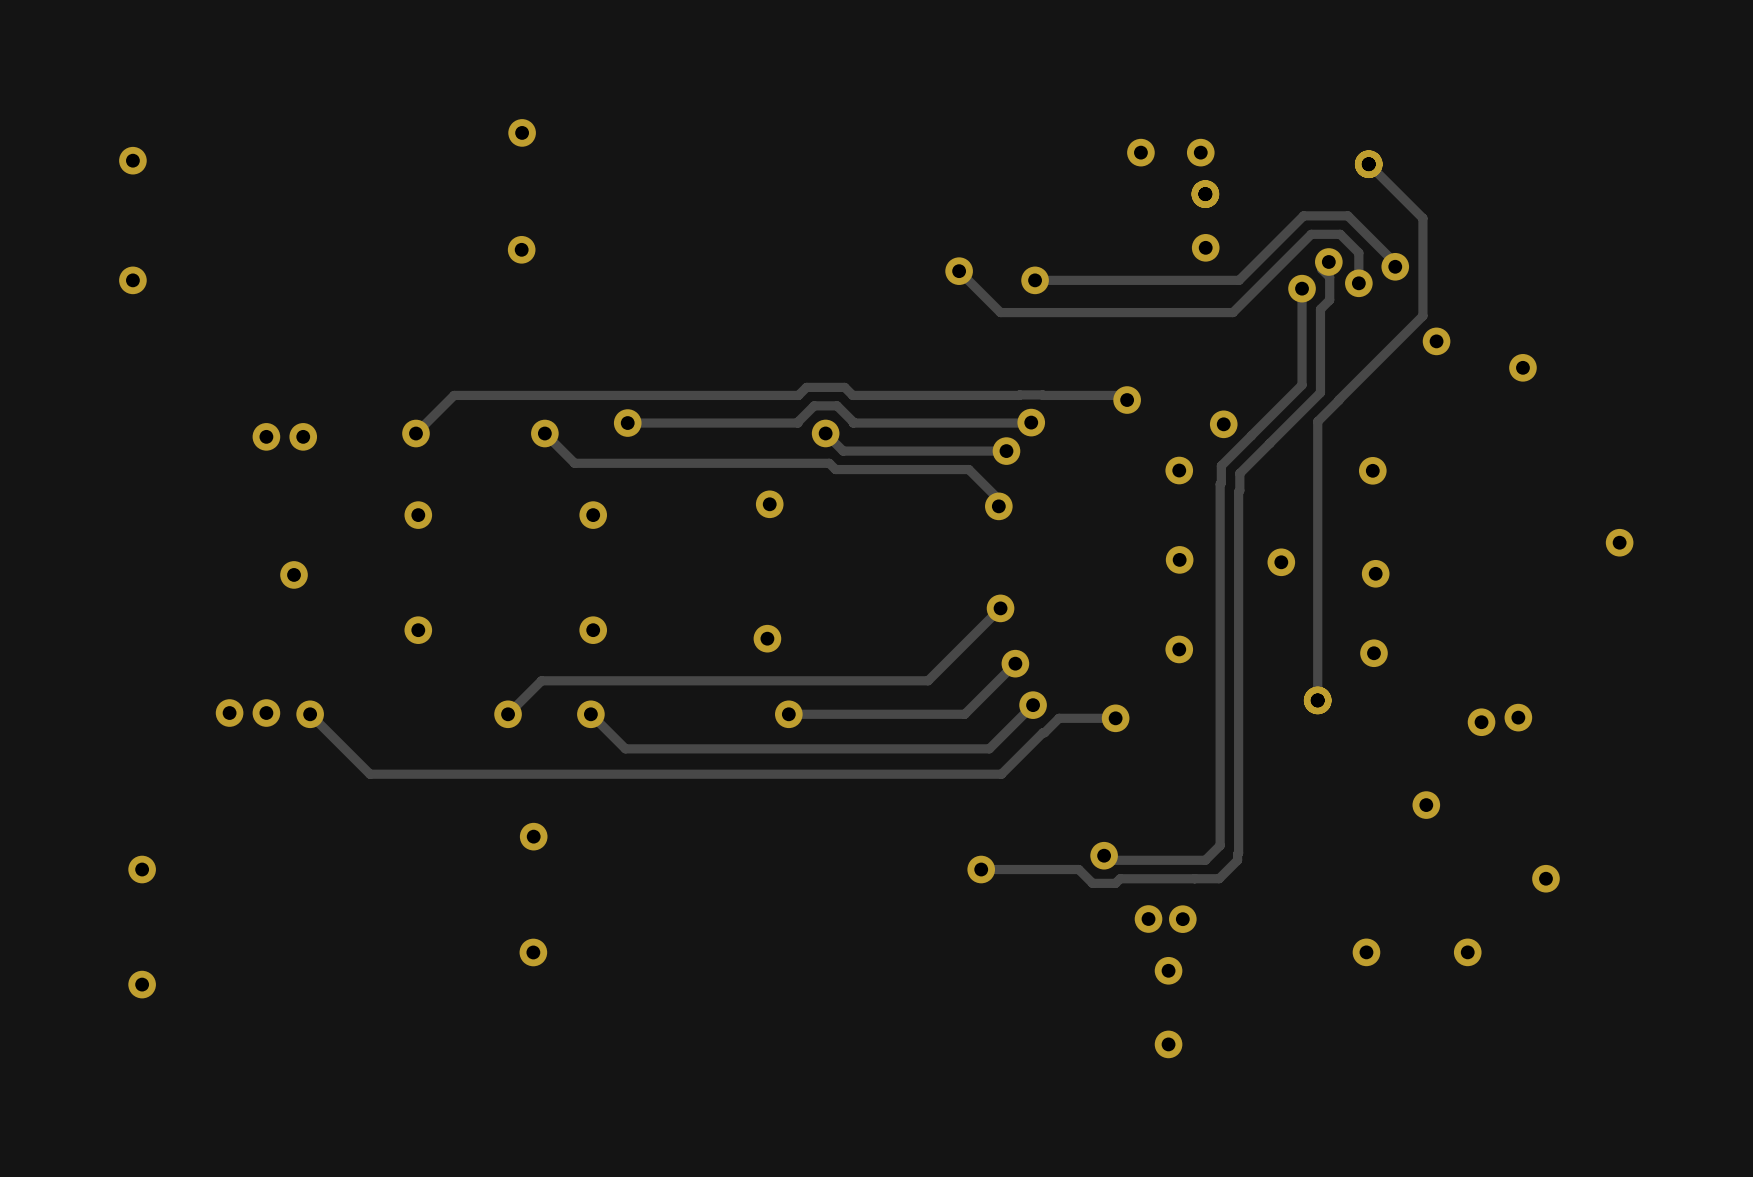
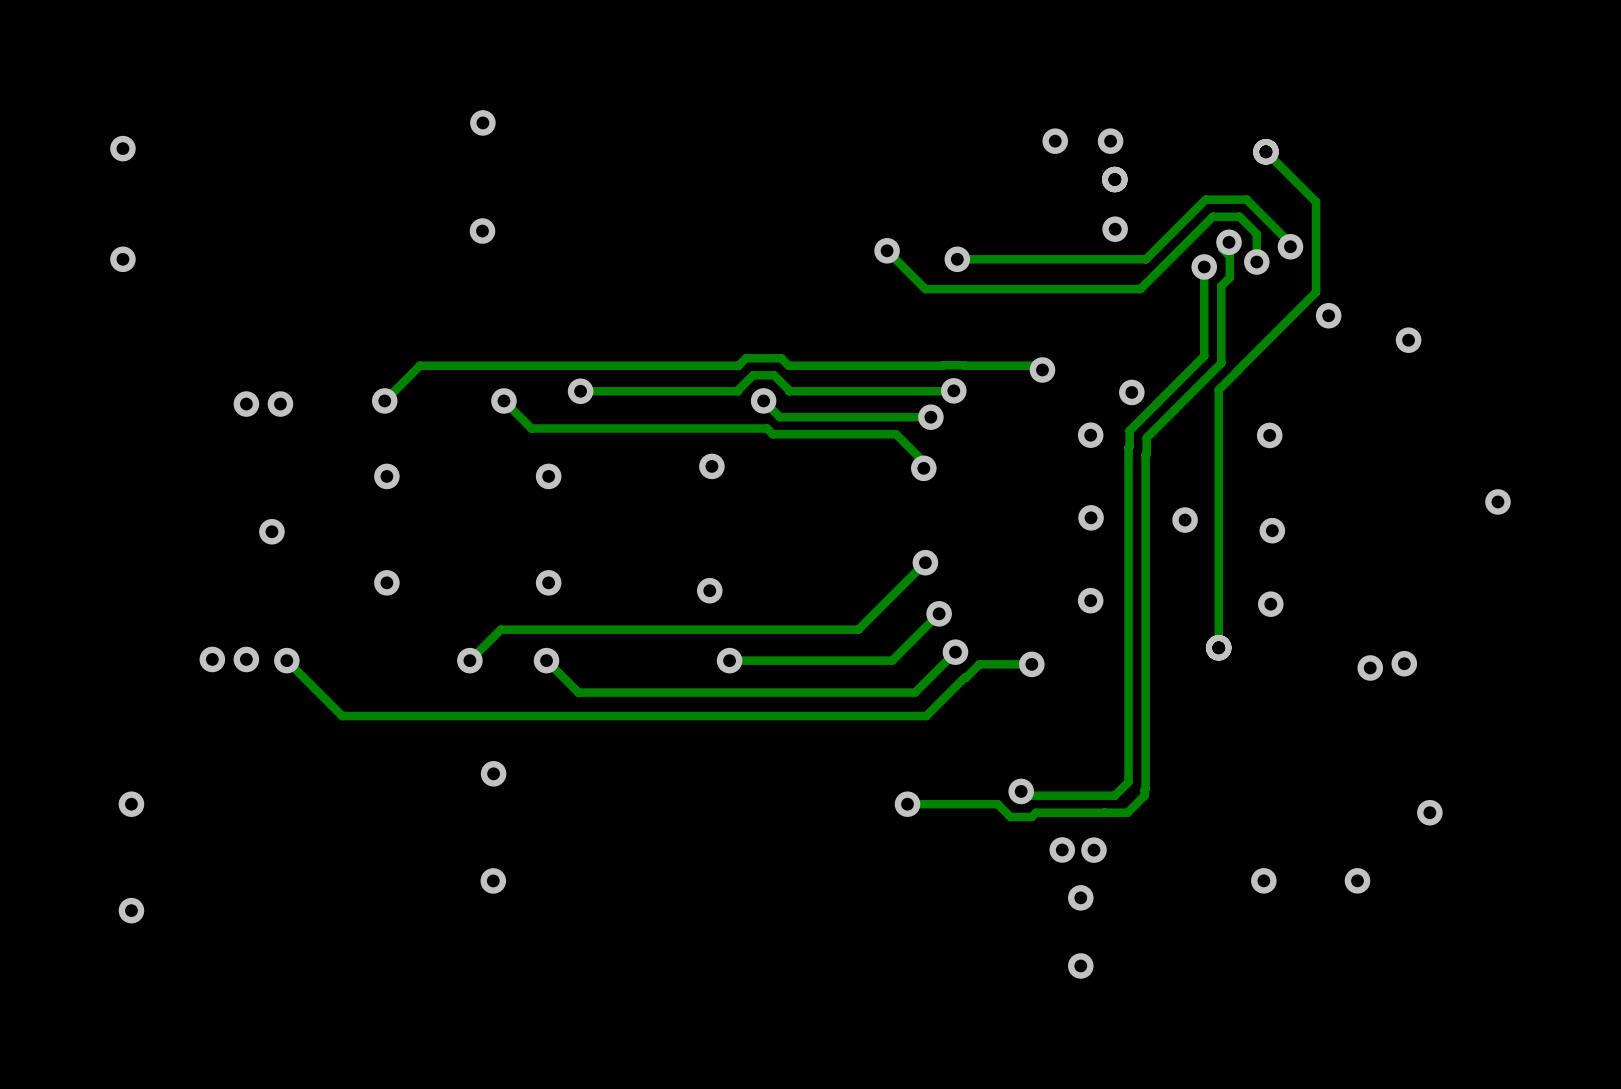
via: (1426, 805) -> none

